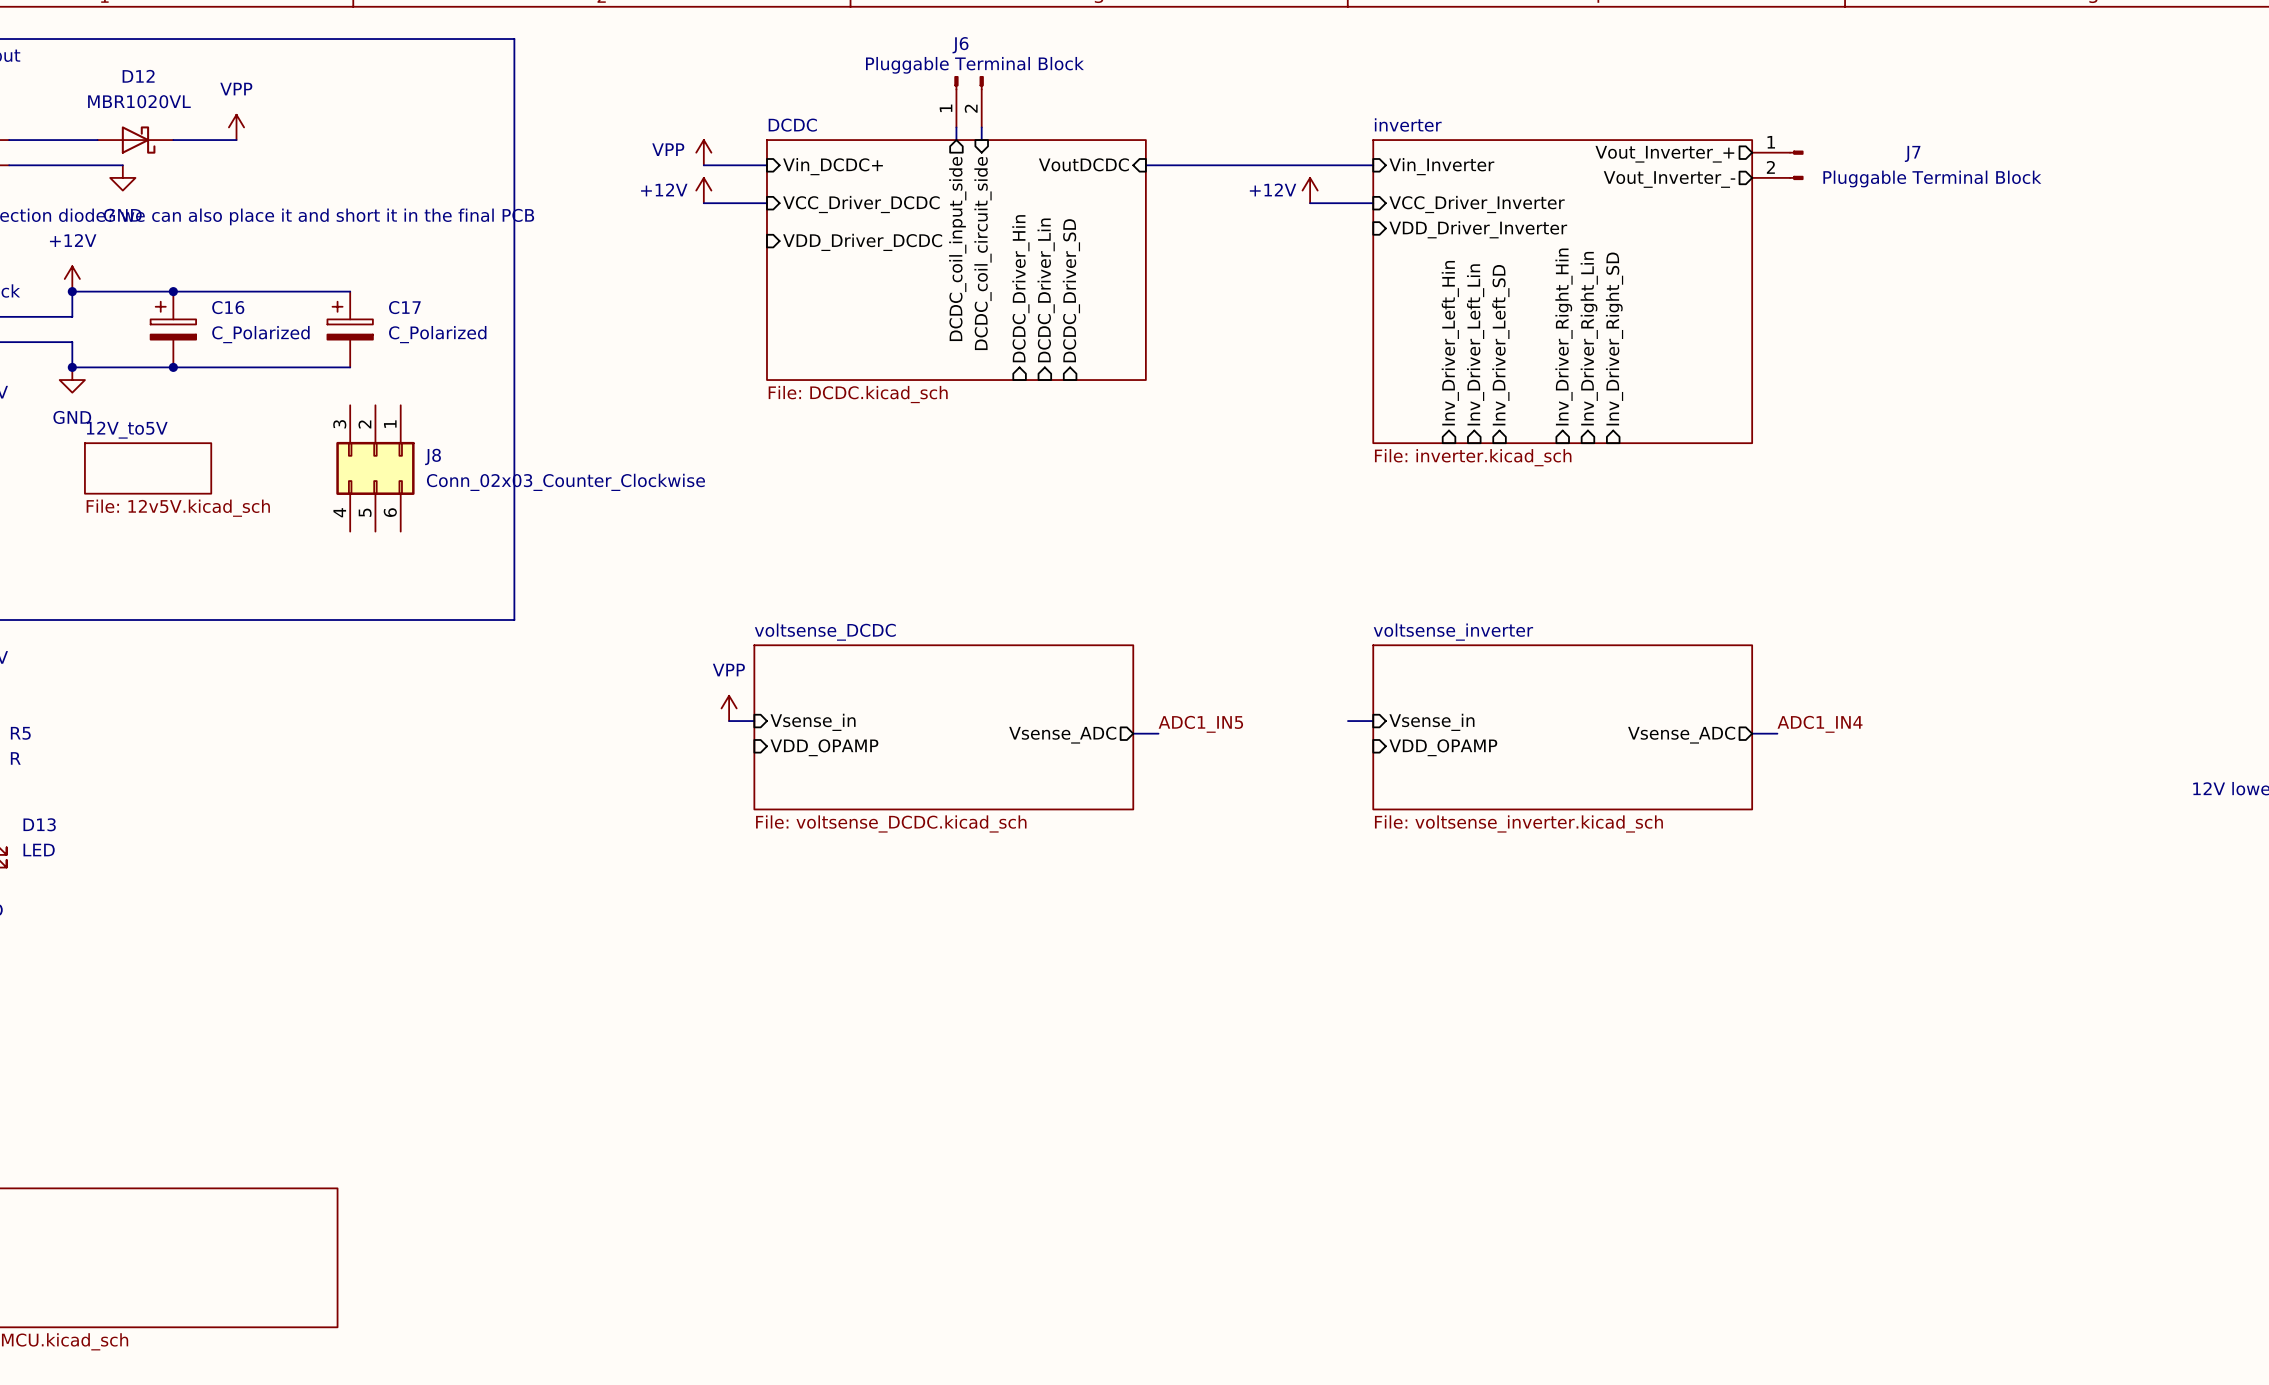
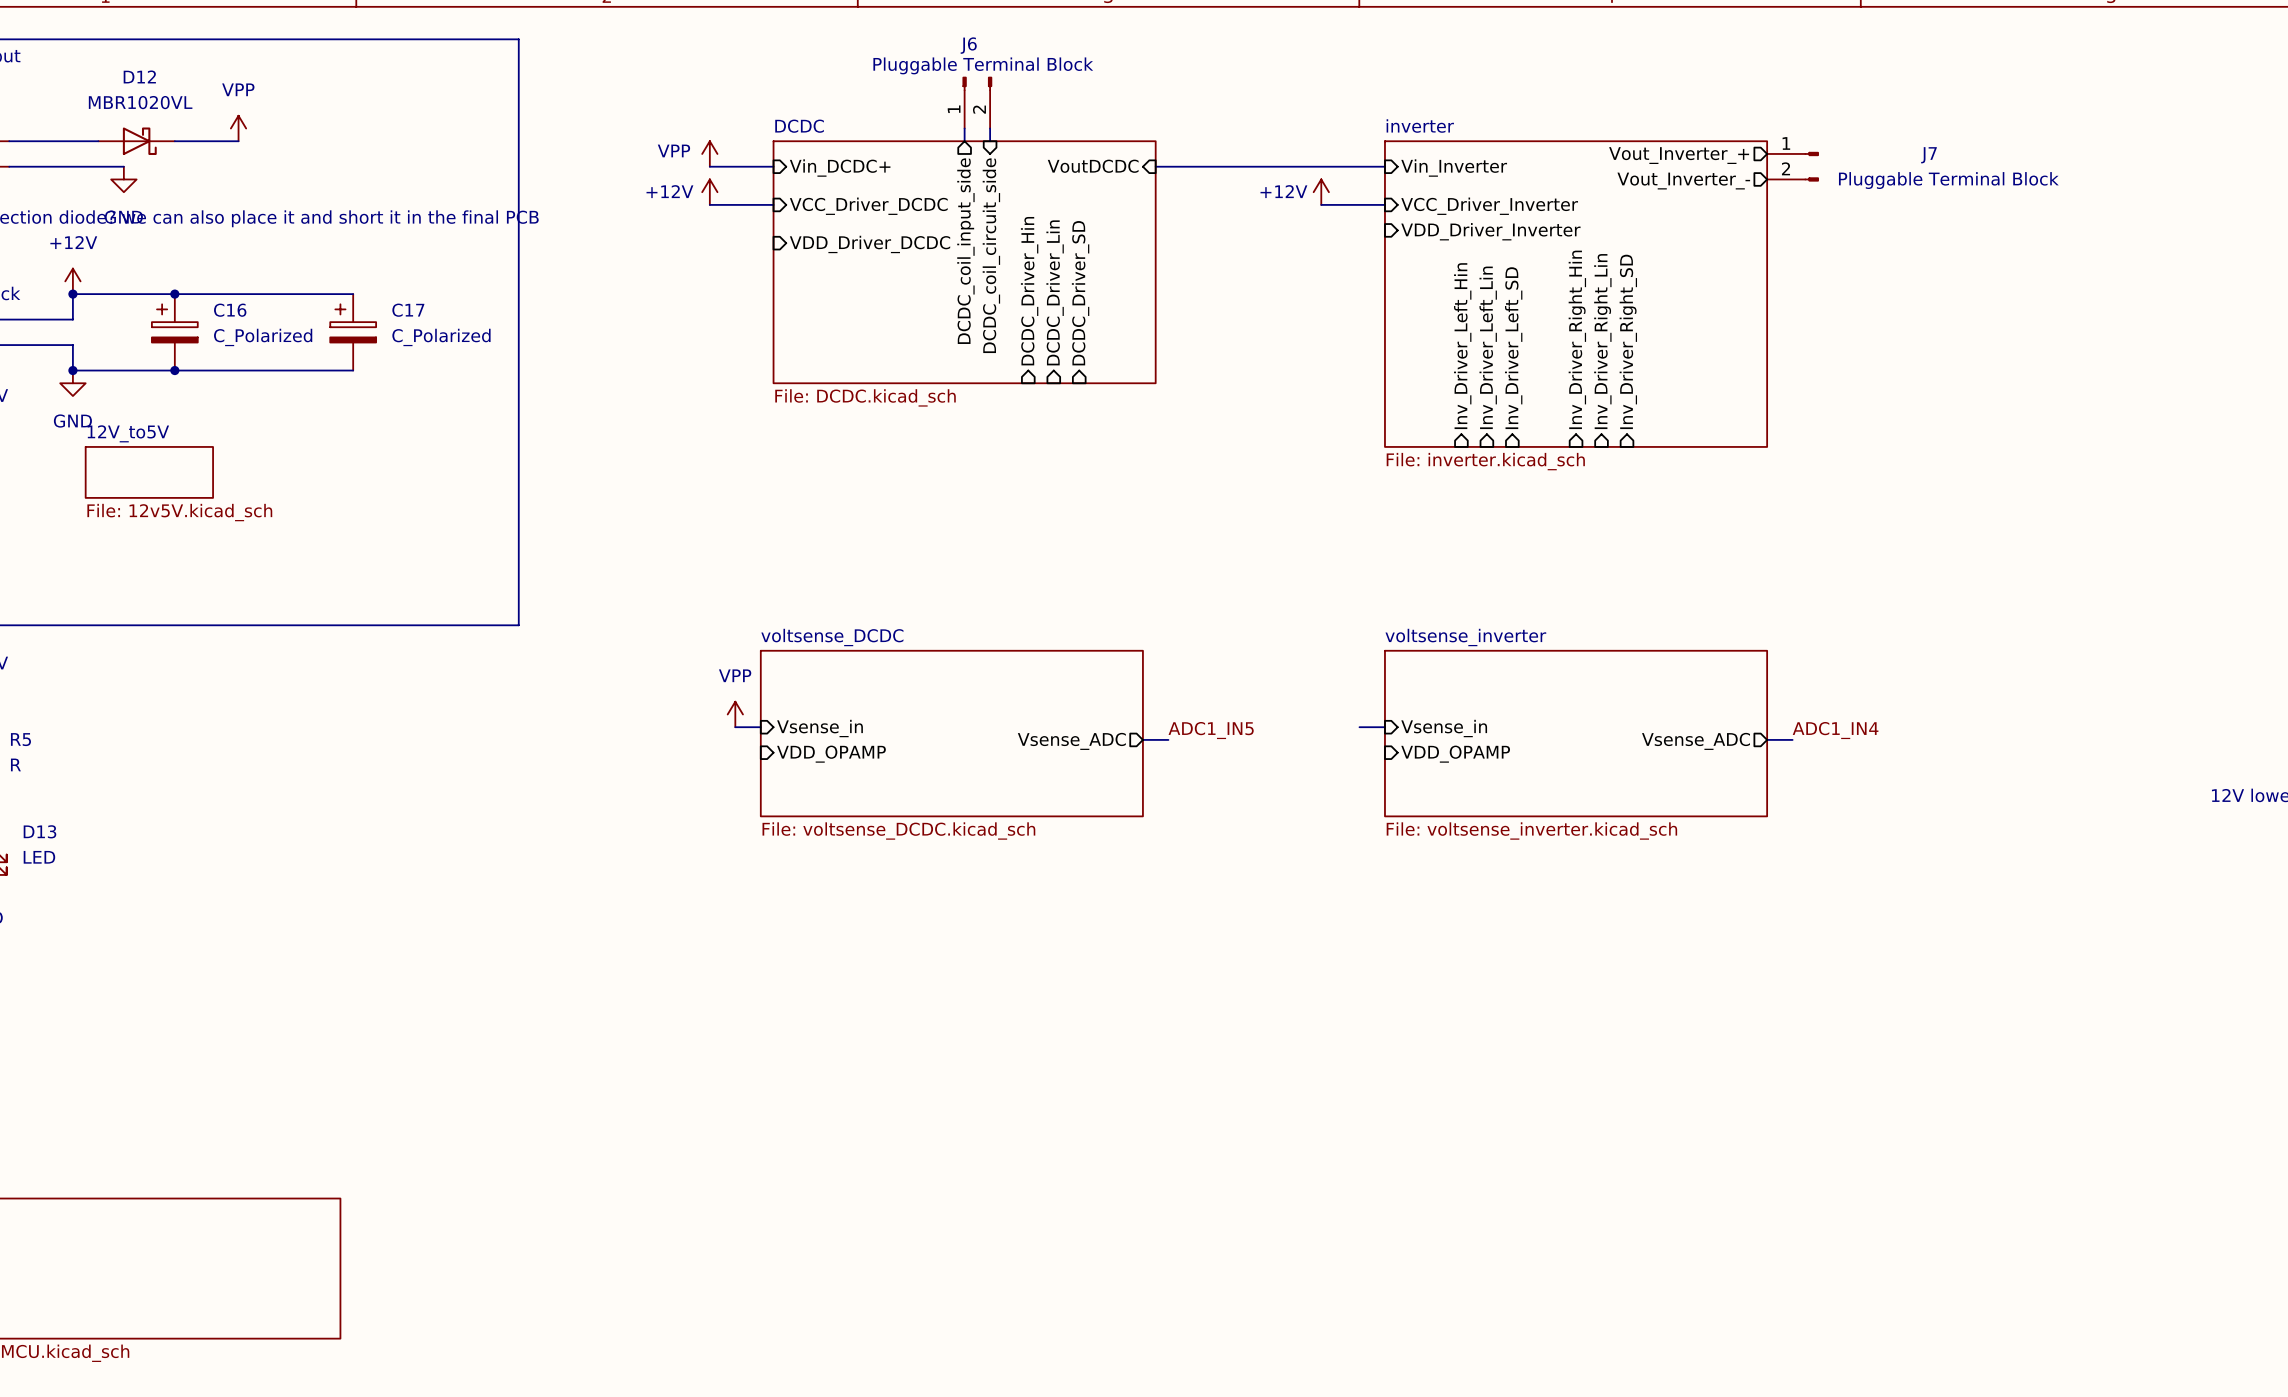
J8: Conn_02x03_Counter_Clockwise (375, 468) -> none

